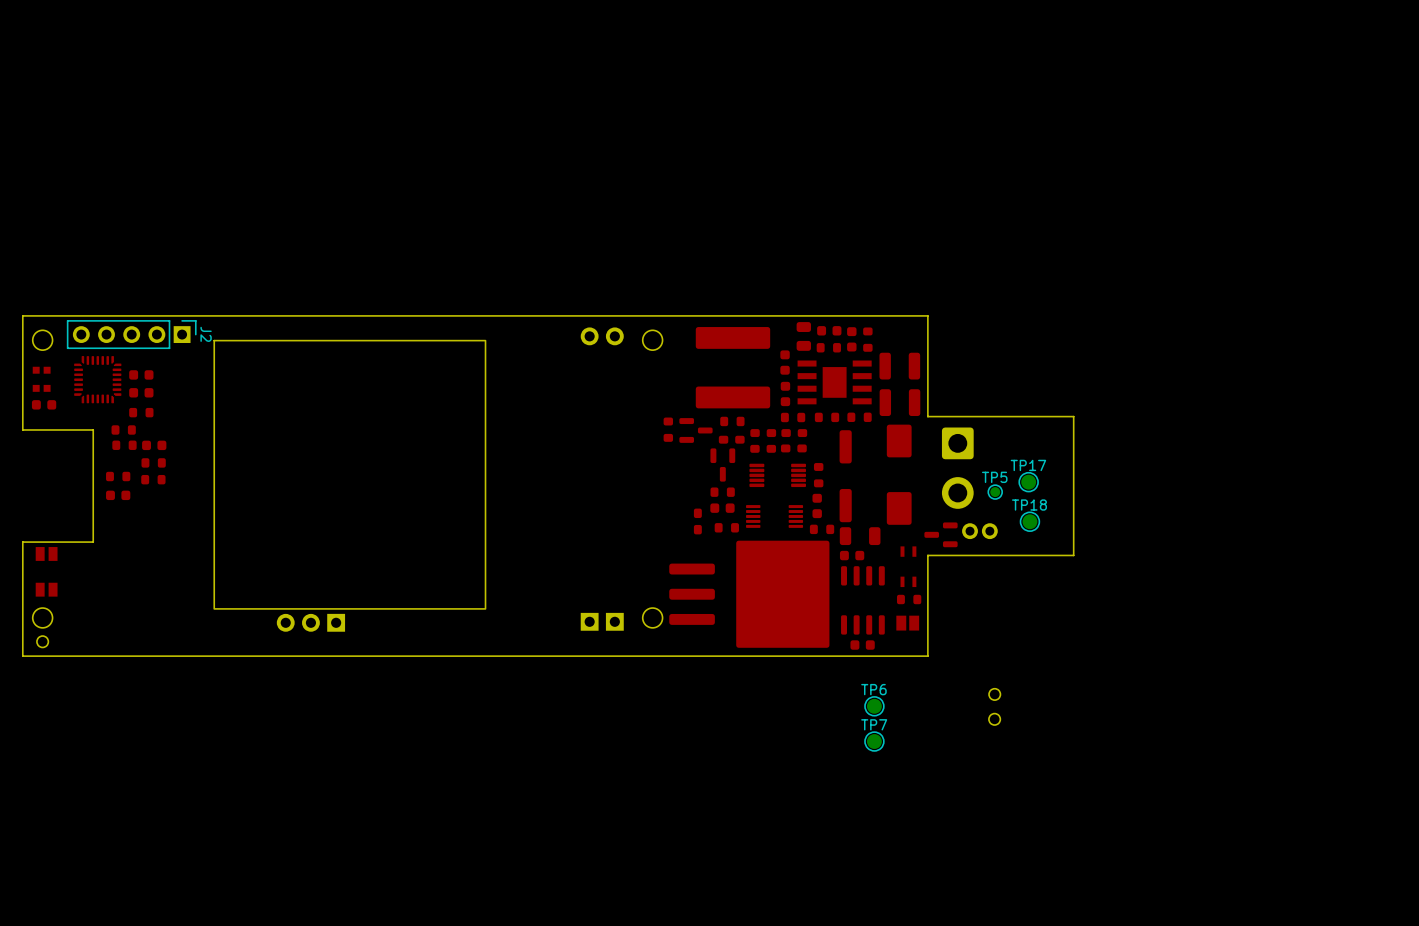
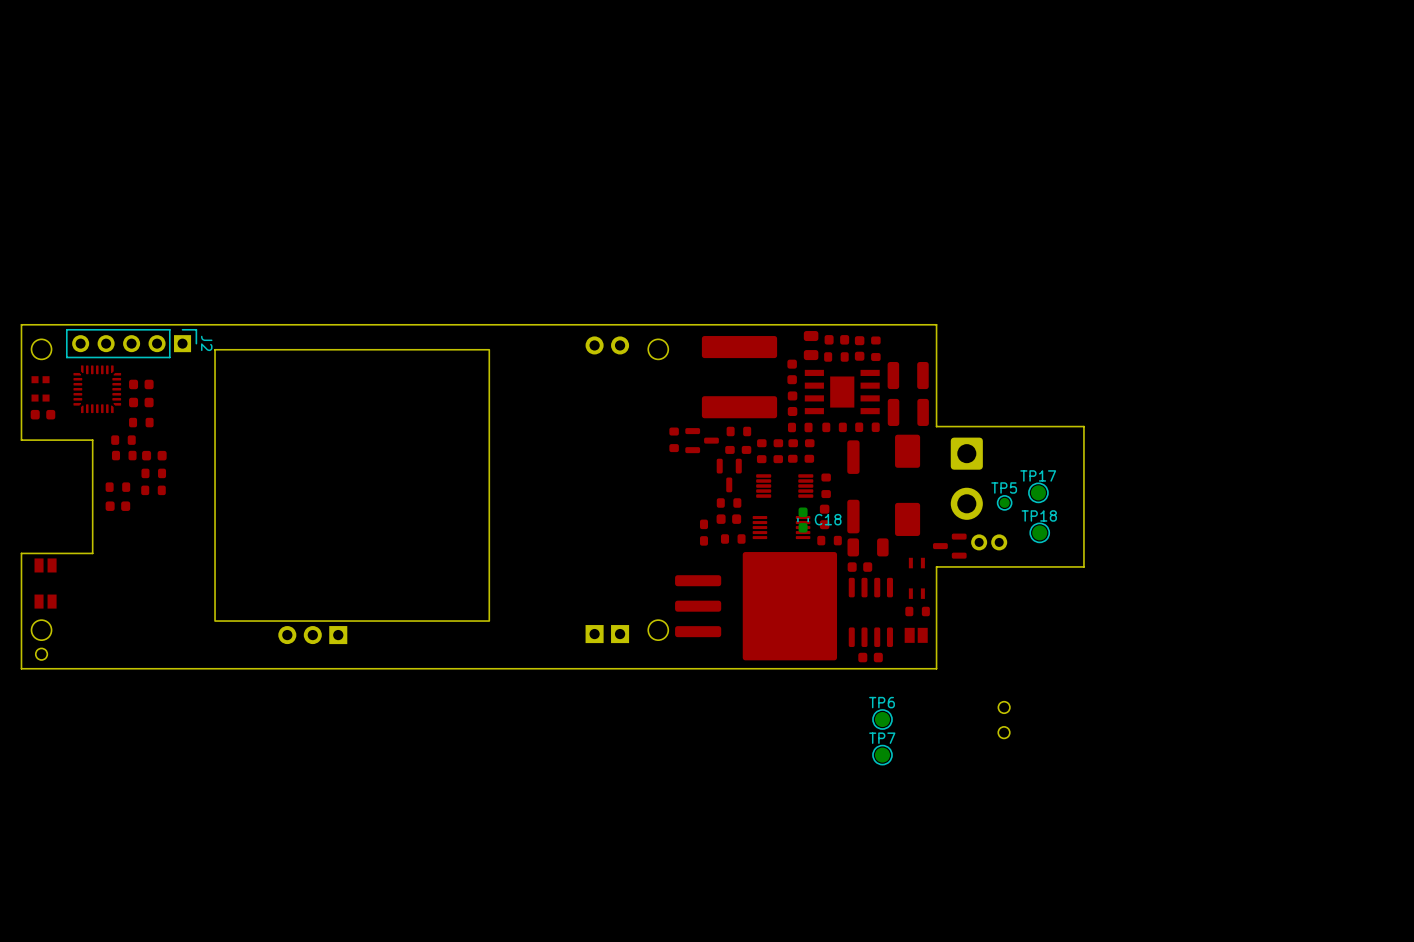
C18: none -> (803, 520)

